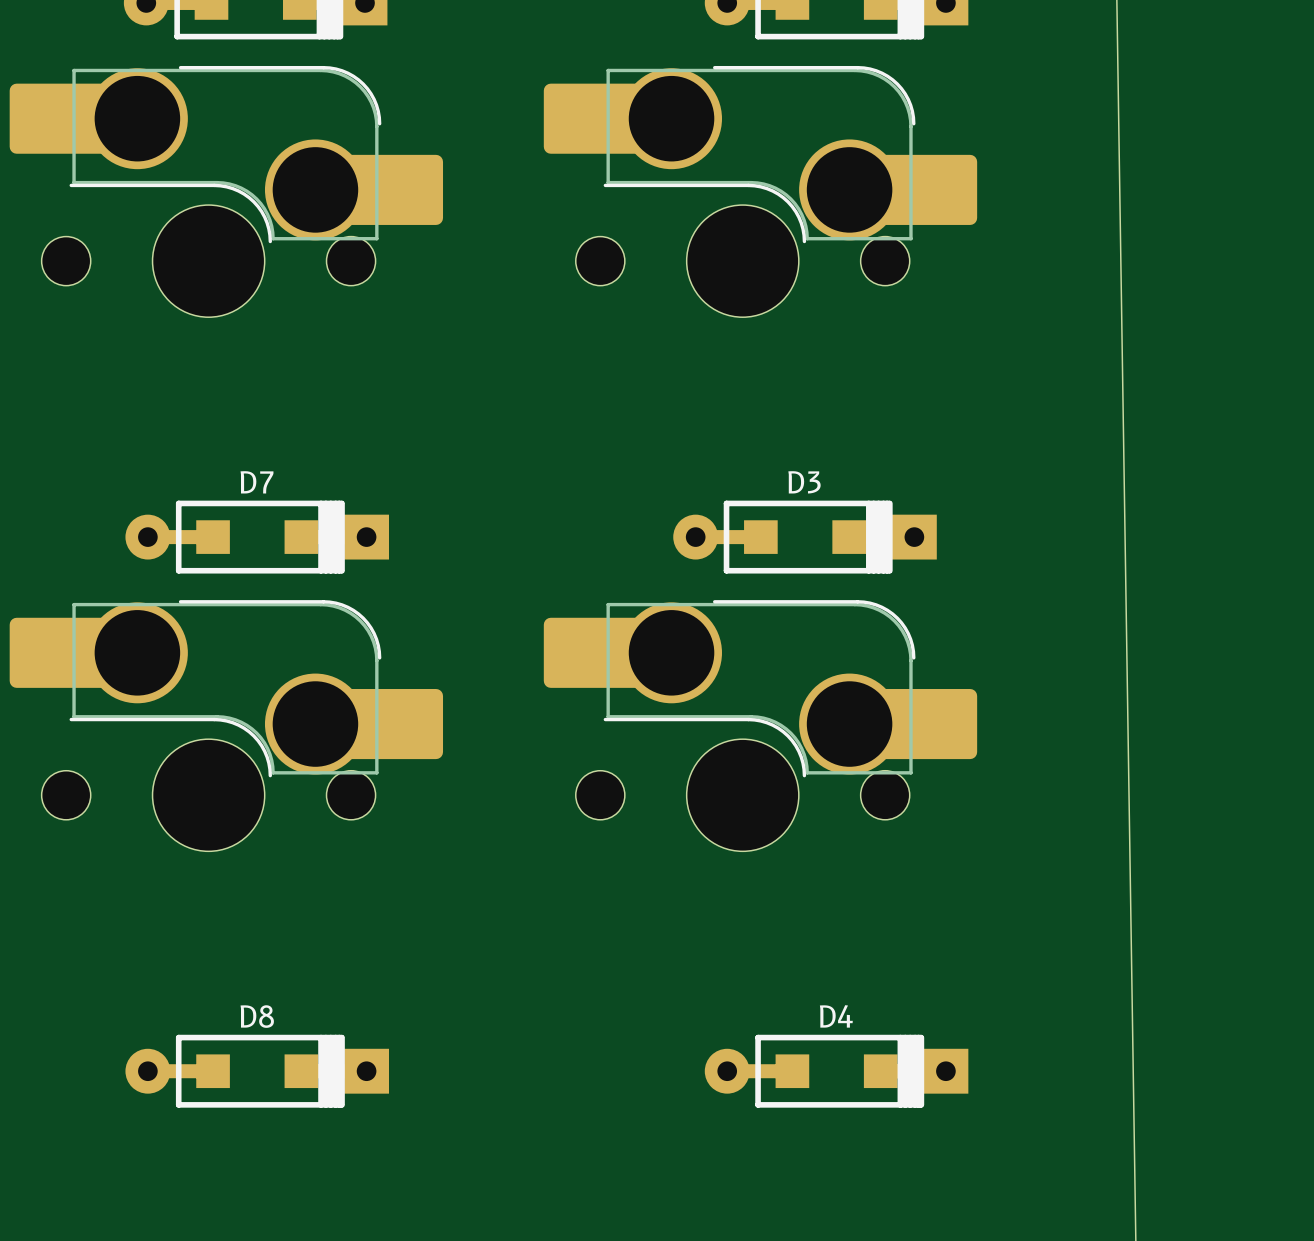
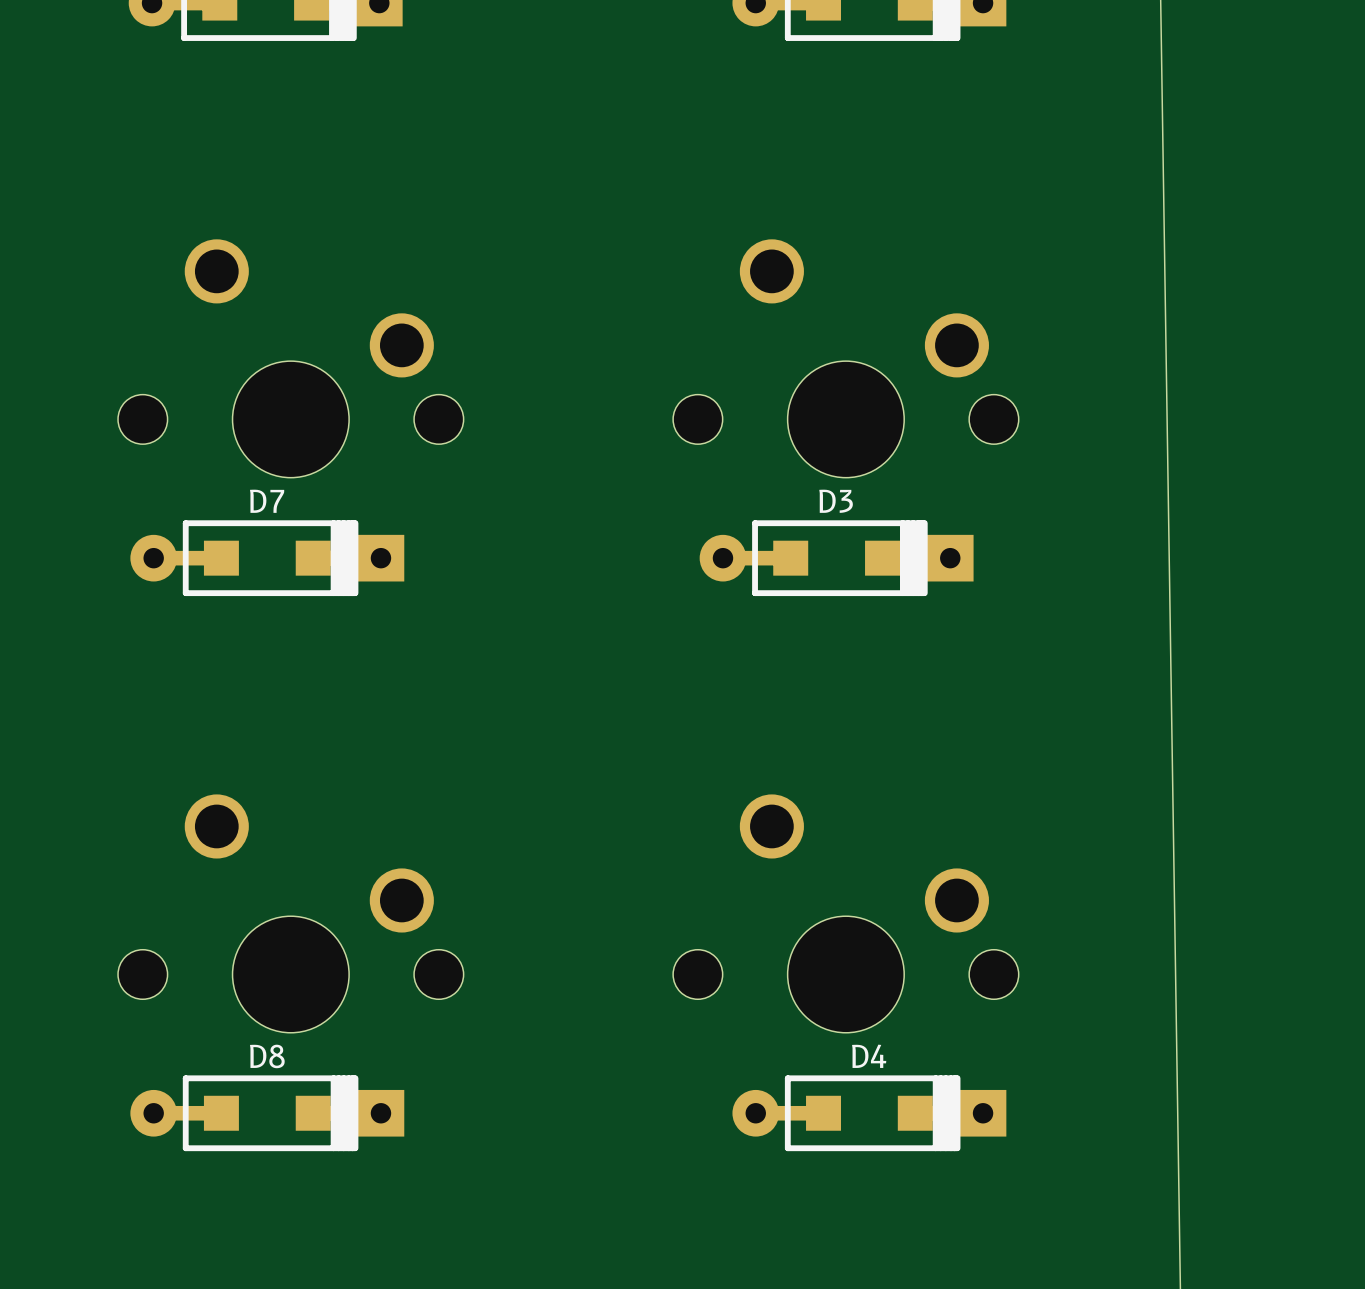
part: (226, 191) -> none
part: (760, 191) -> none
part: none -> (290, 358)
part: none -> (845, 358)
part: (226, 725) -> none
part: (760, 725) -> none
part: none -> (290, 913)
part: none -> (845, 913)

